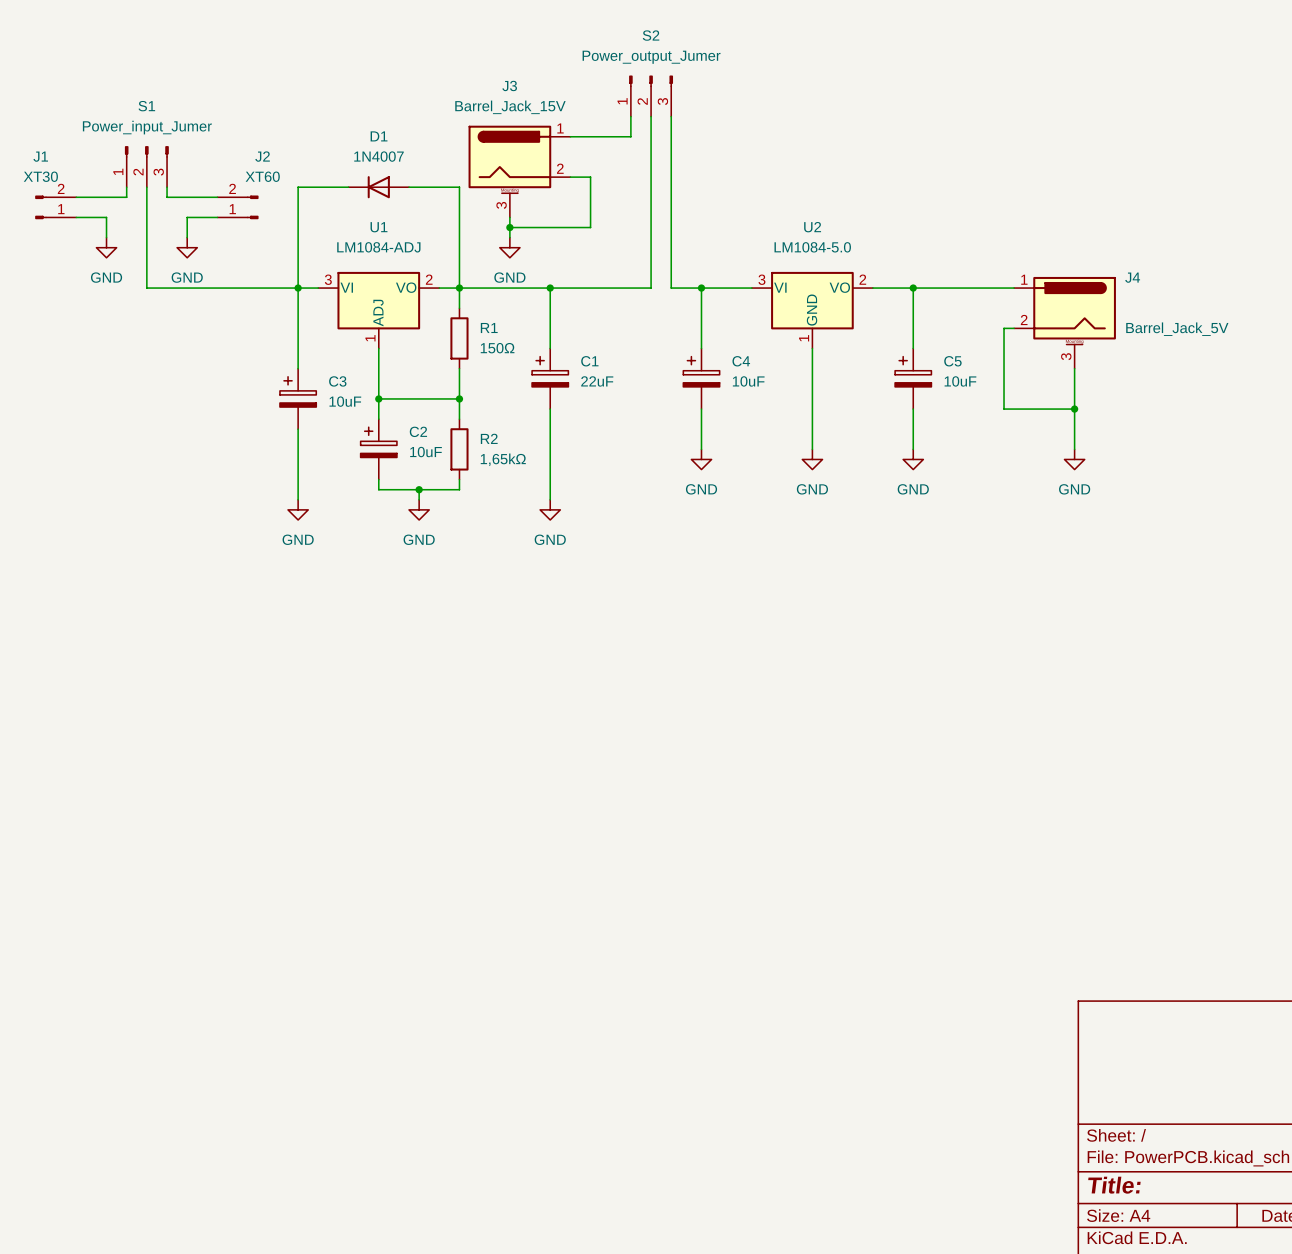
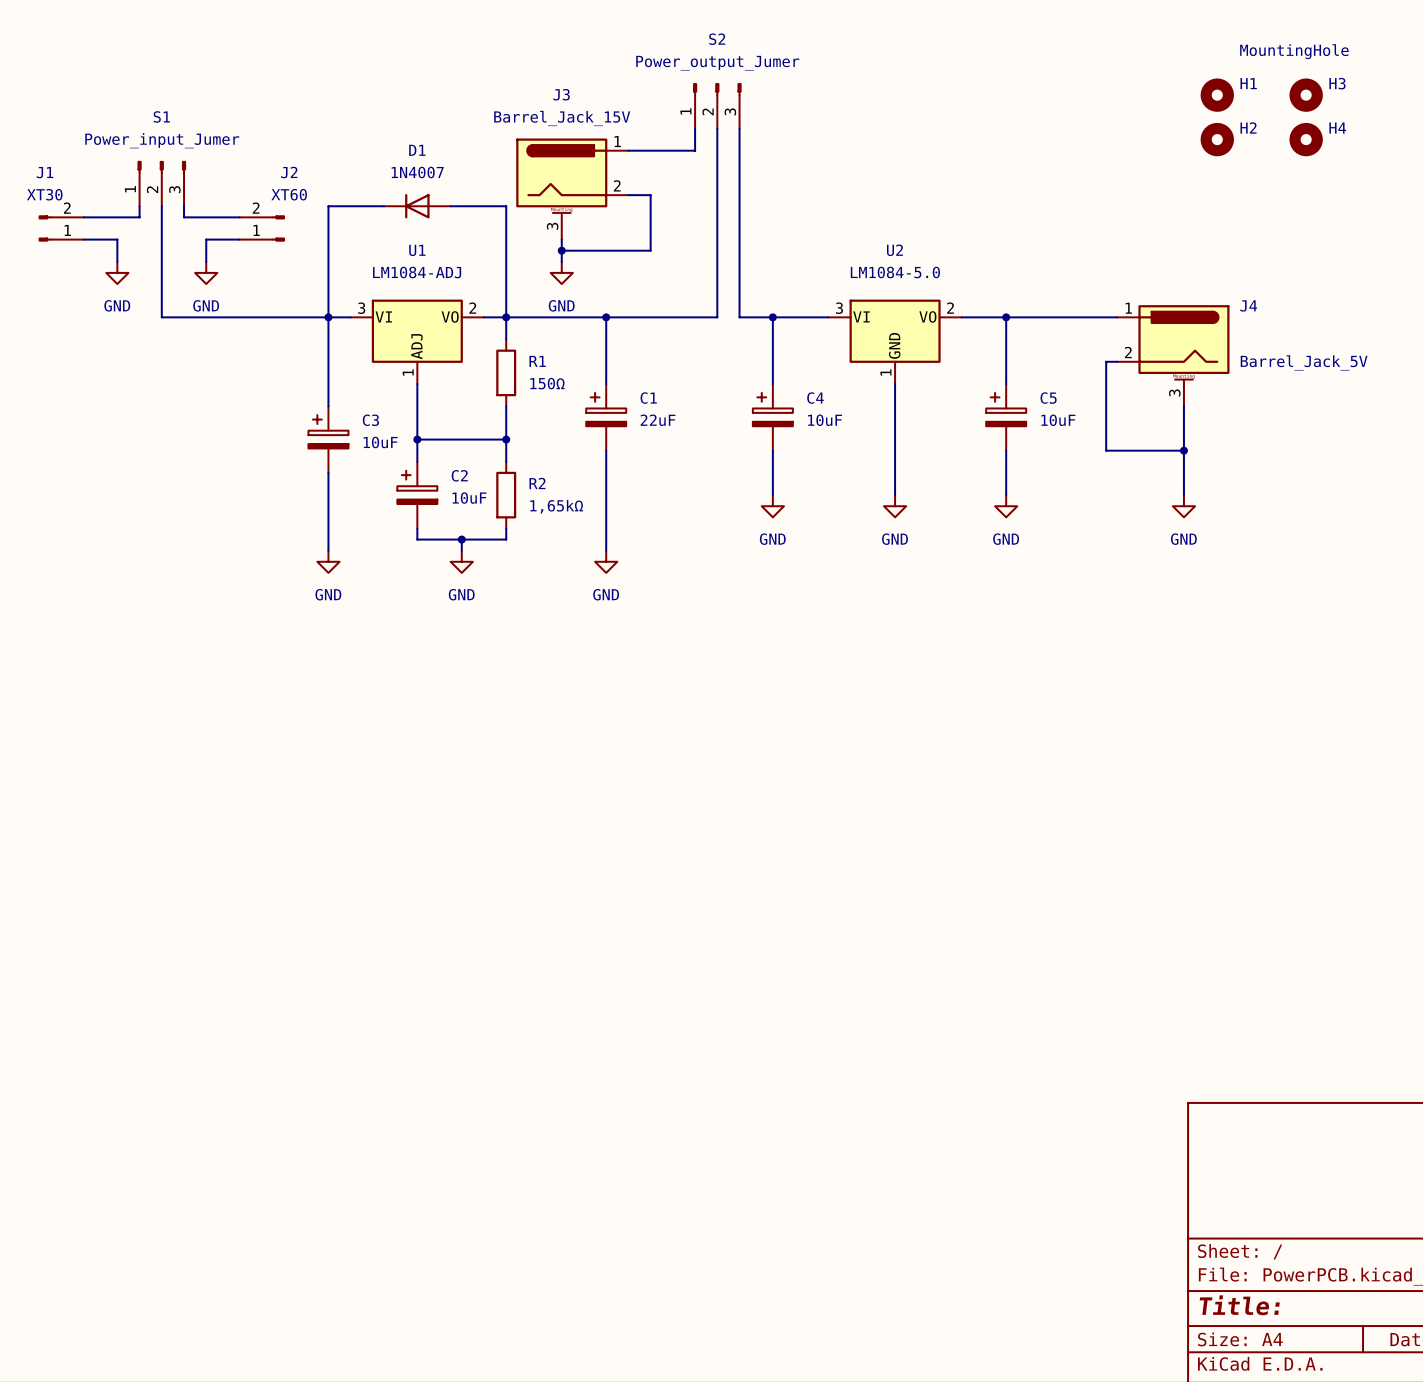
H1: none -> MountingHole (1217, 95)
H3: none -> (1306, 95)
H2: none -> (1217, 139)
H4: none -> (1306, 139)

